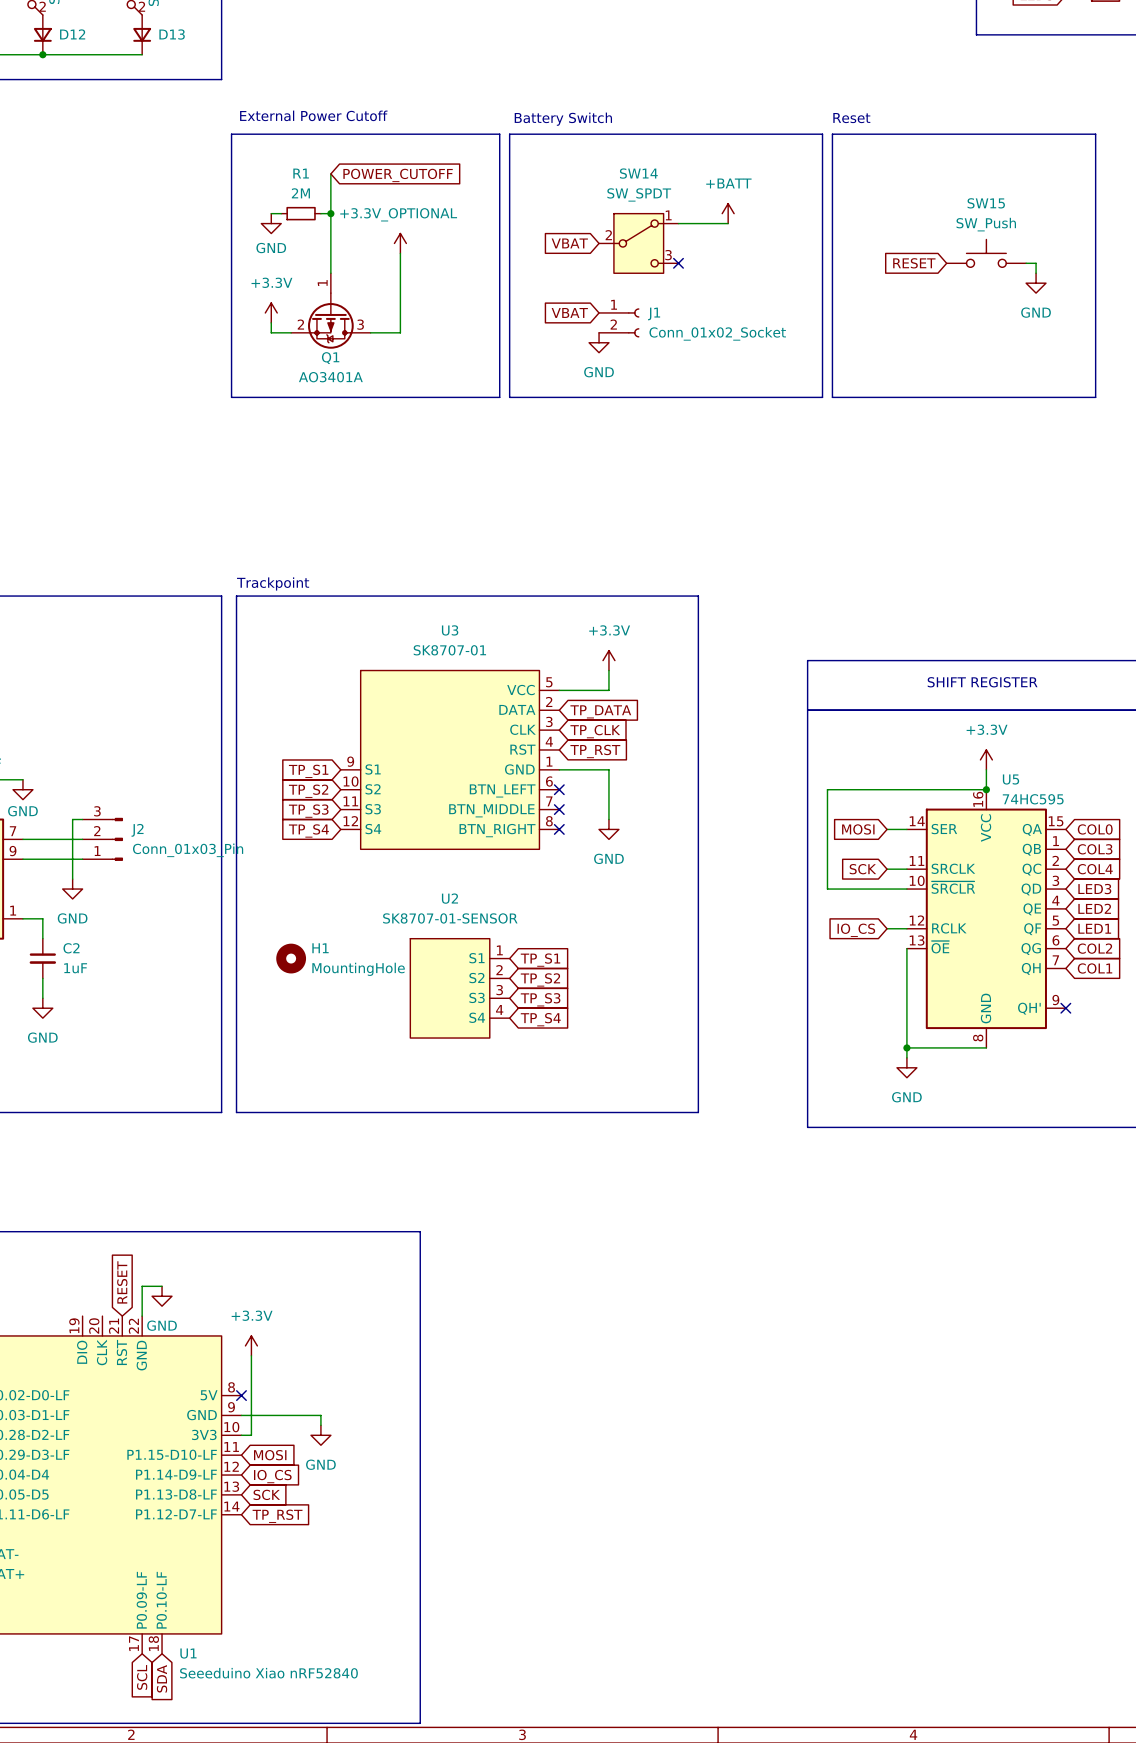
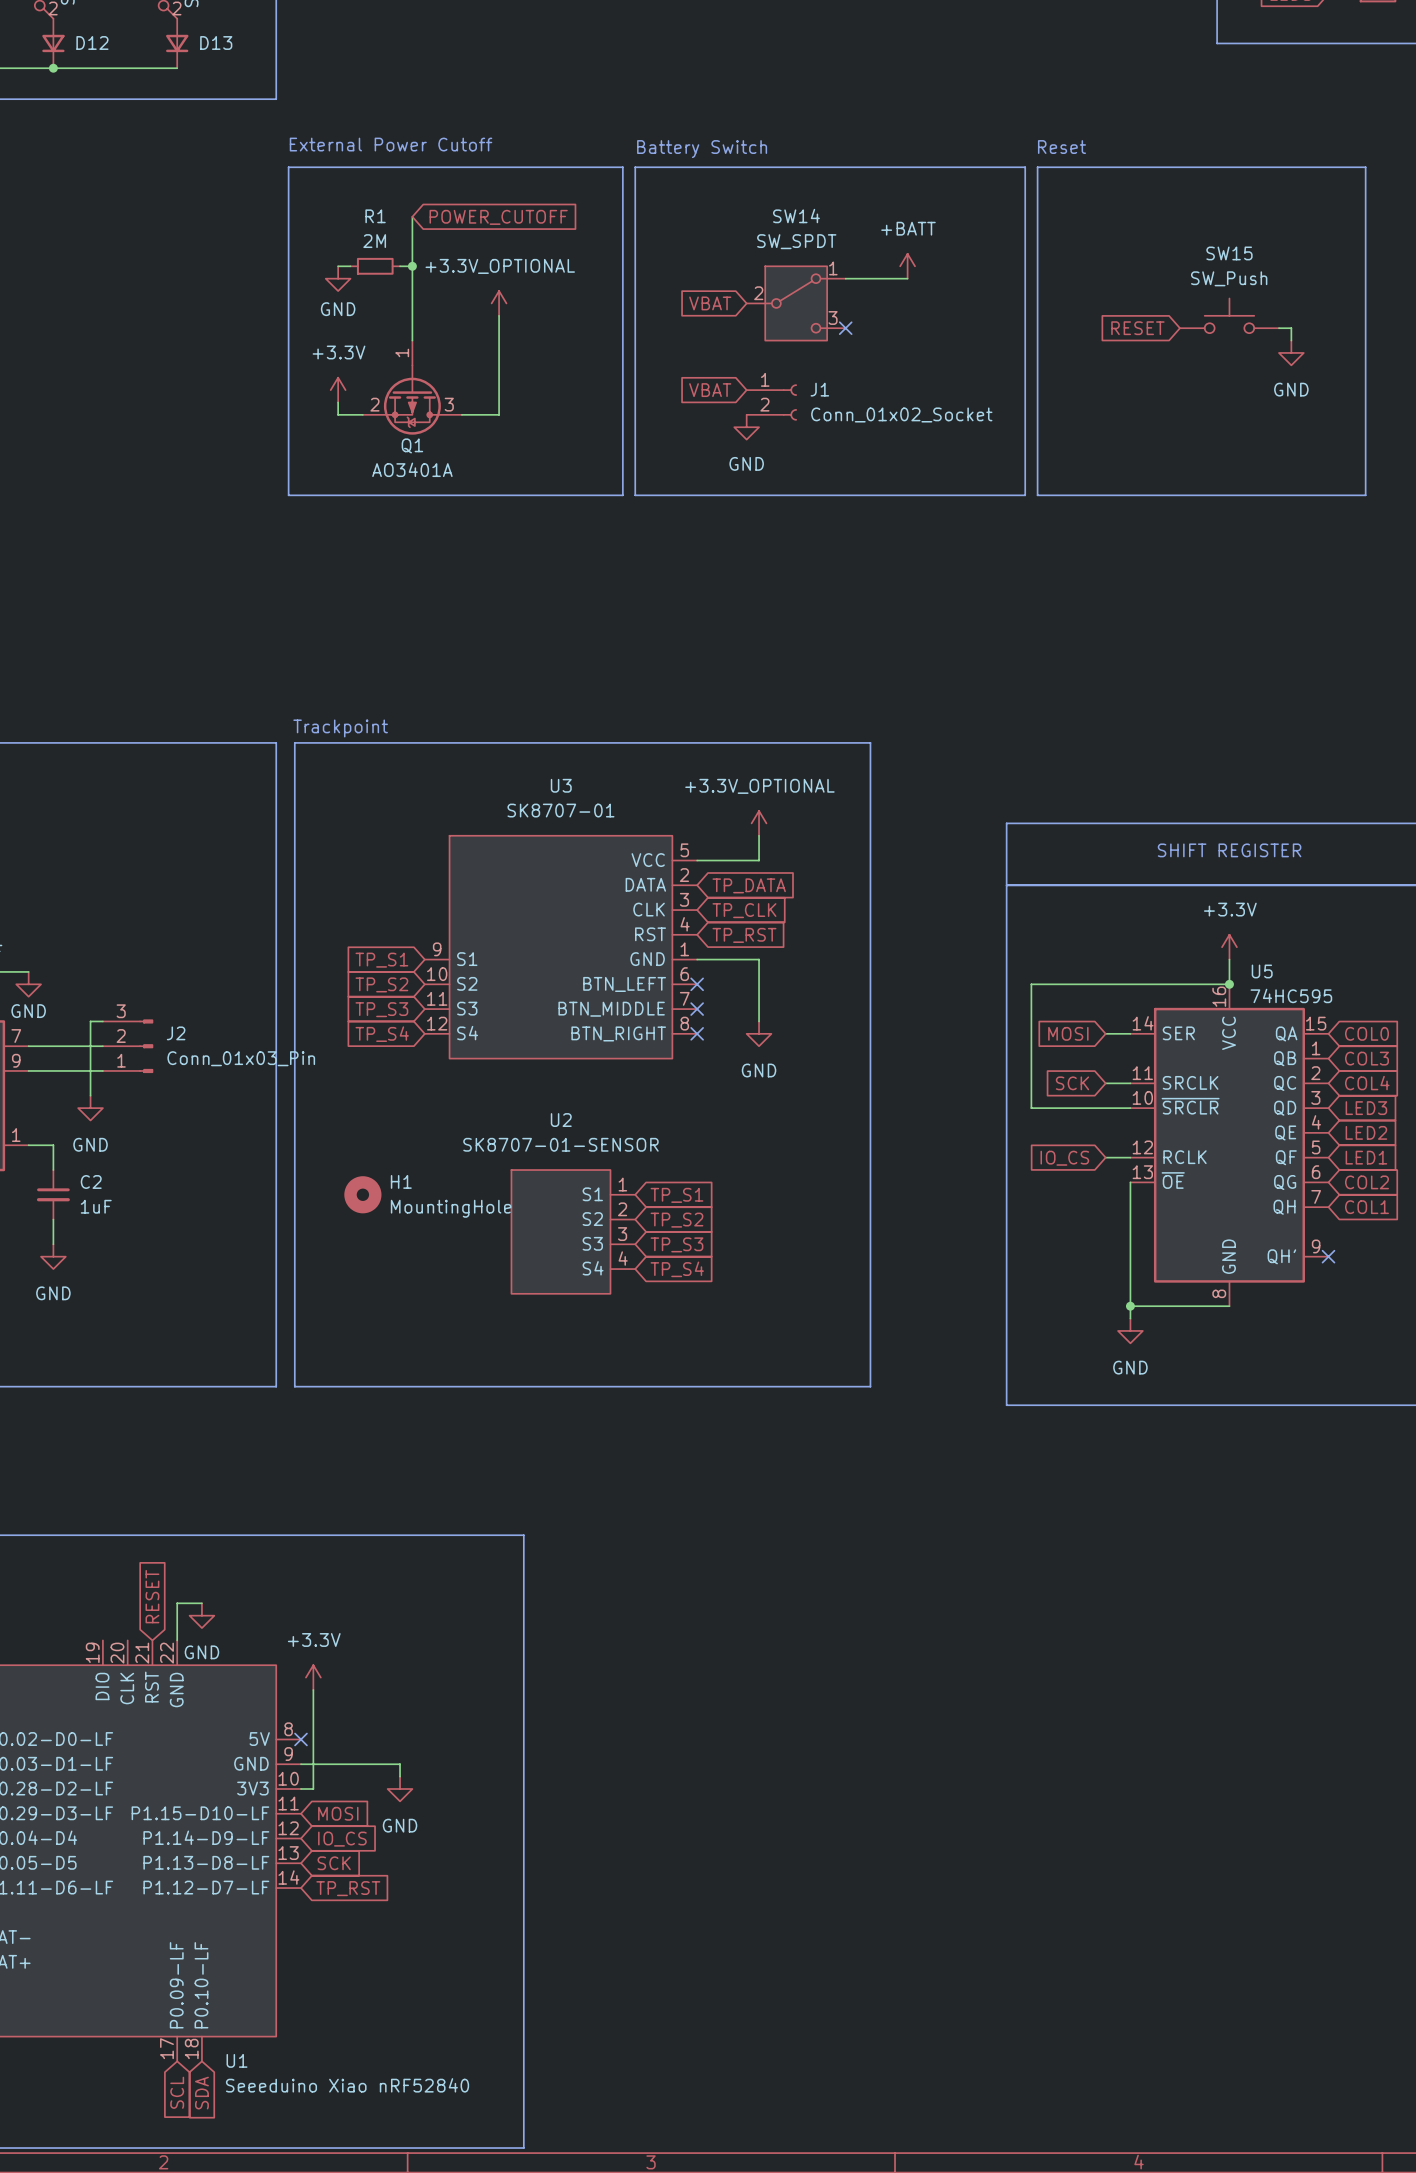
power symbol: +3.3V (608, 660) -> +3.3V_OPTIONAL (759, 823)

